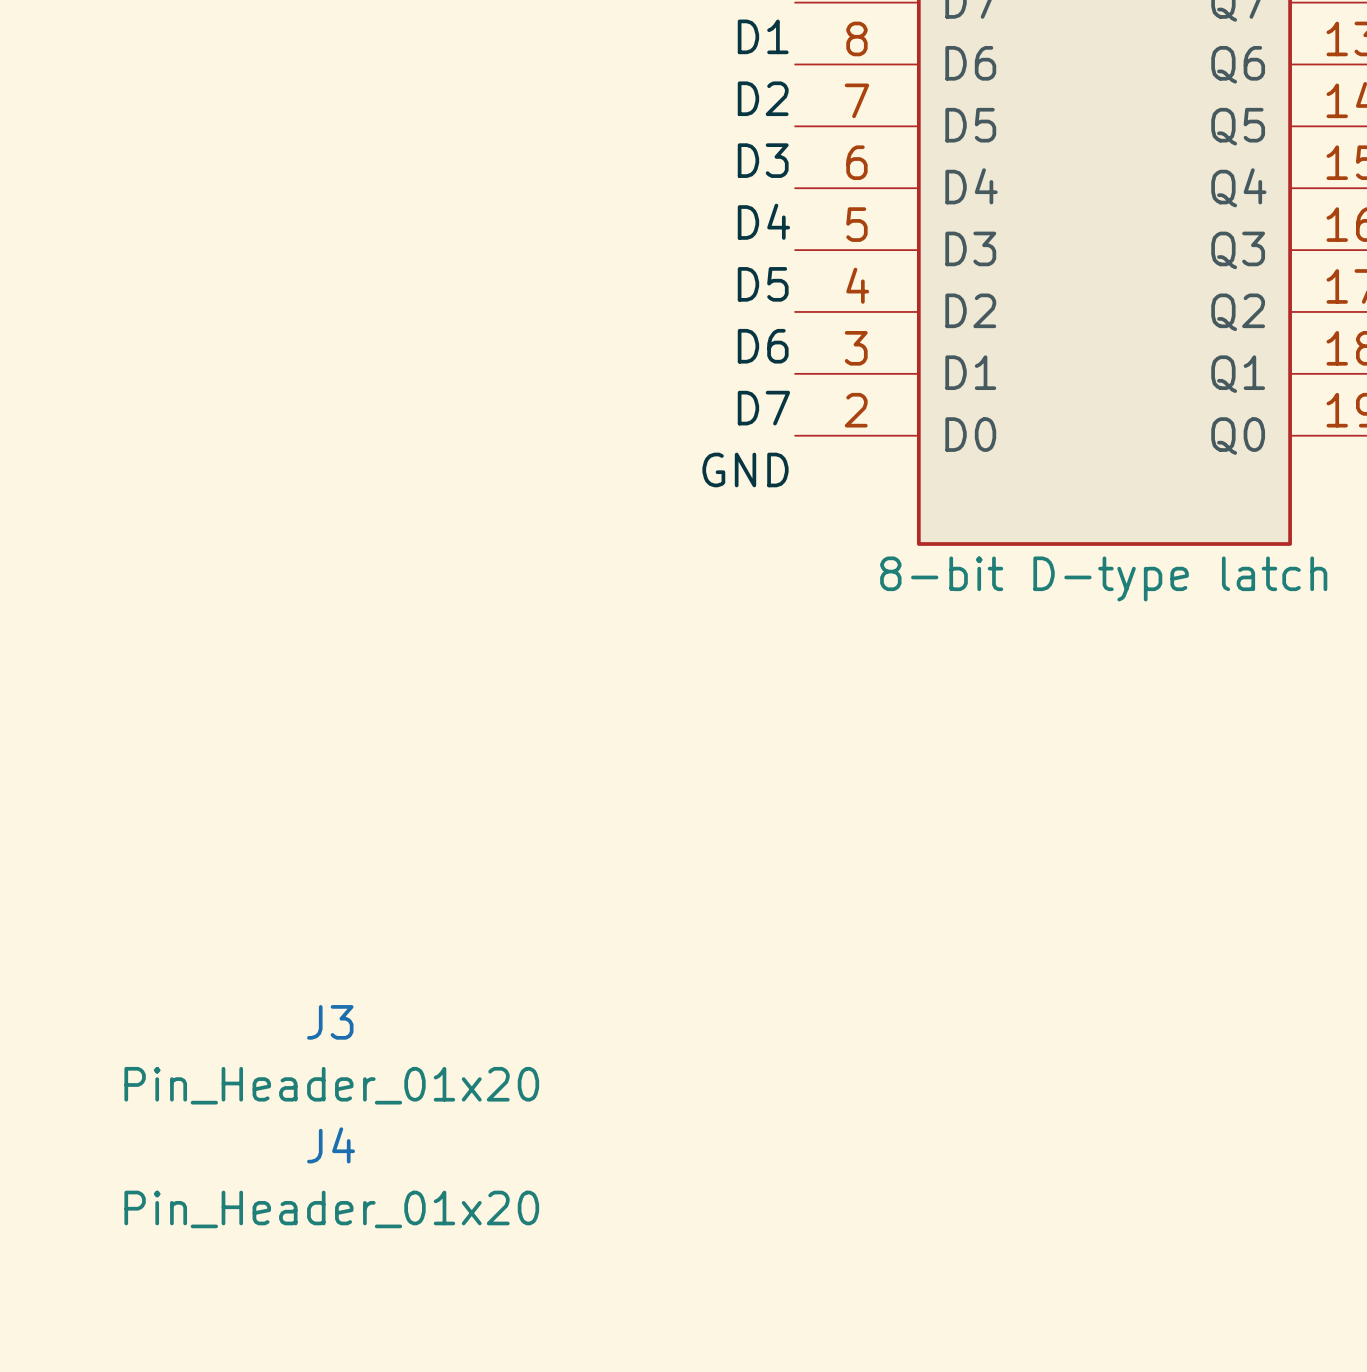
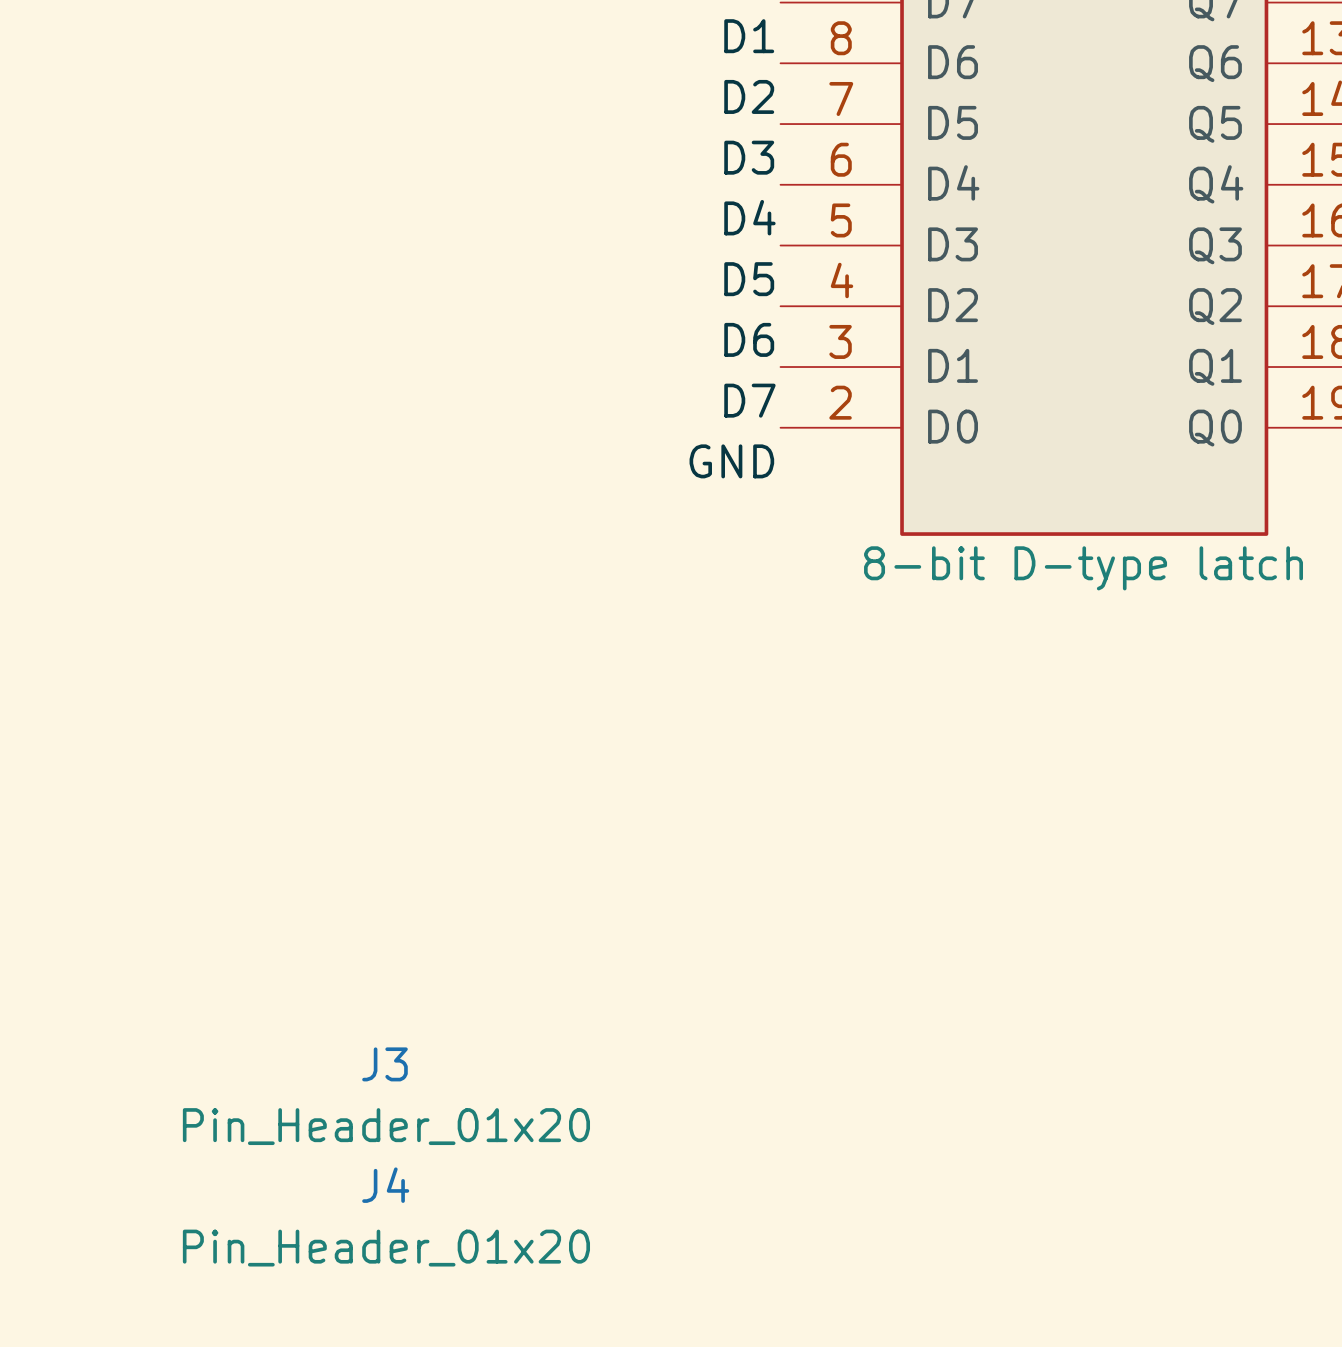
J3 position: (331, 1054) -> (386, 1096)
J4 position: (331, 1177) -> (386, 1216)

